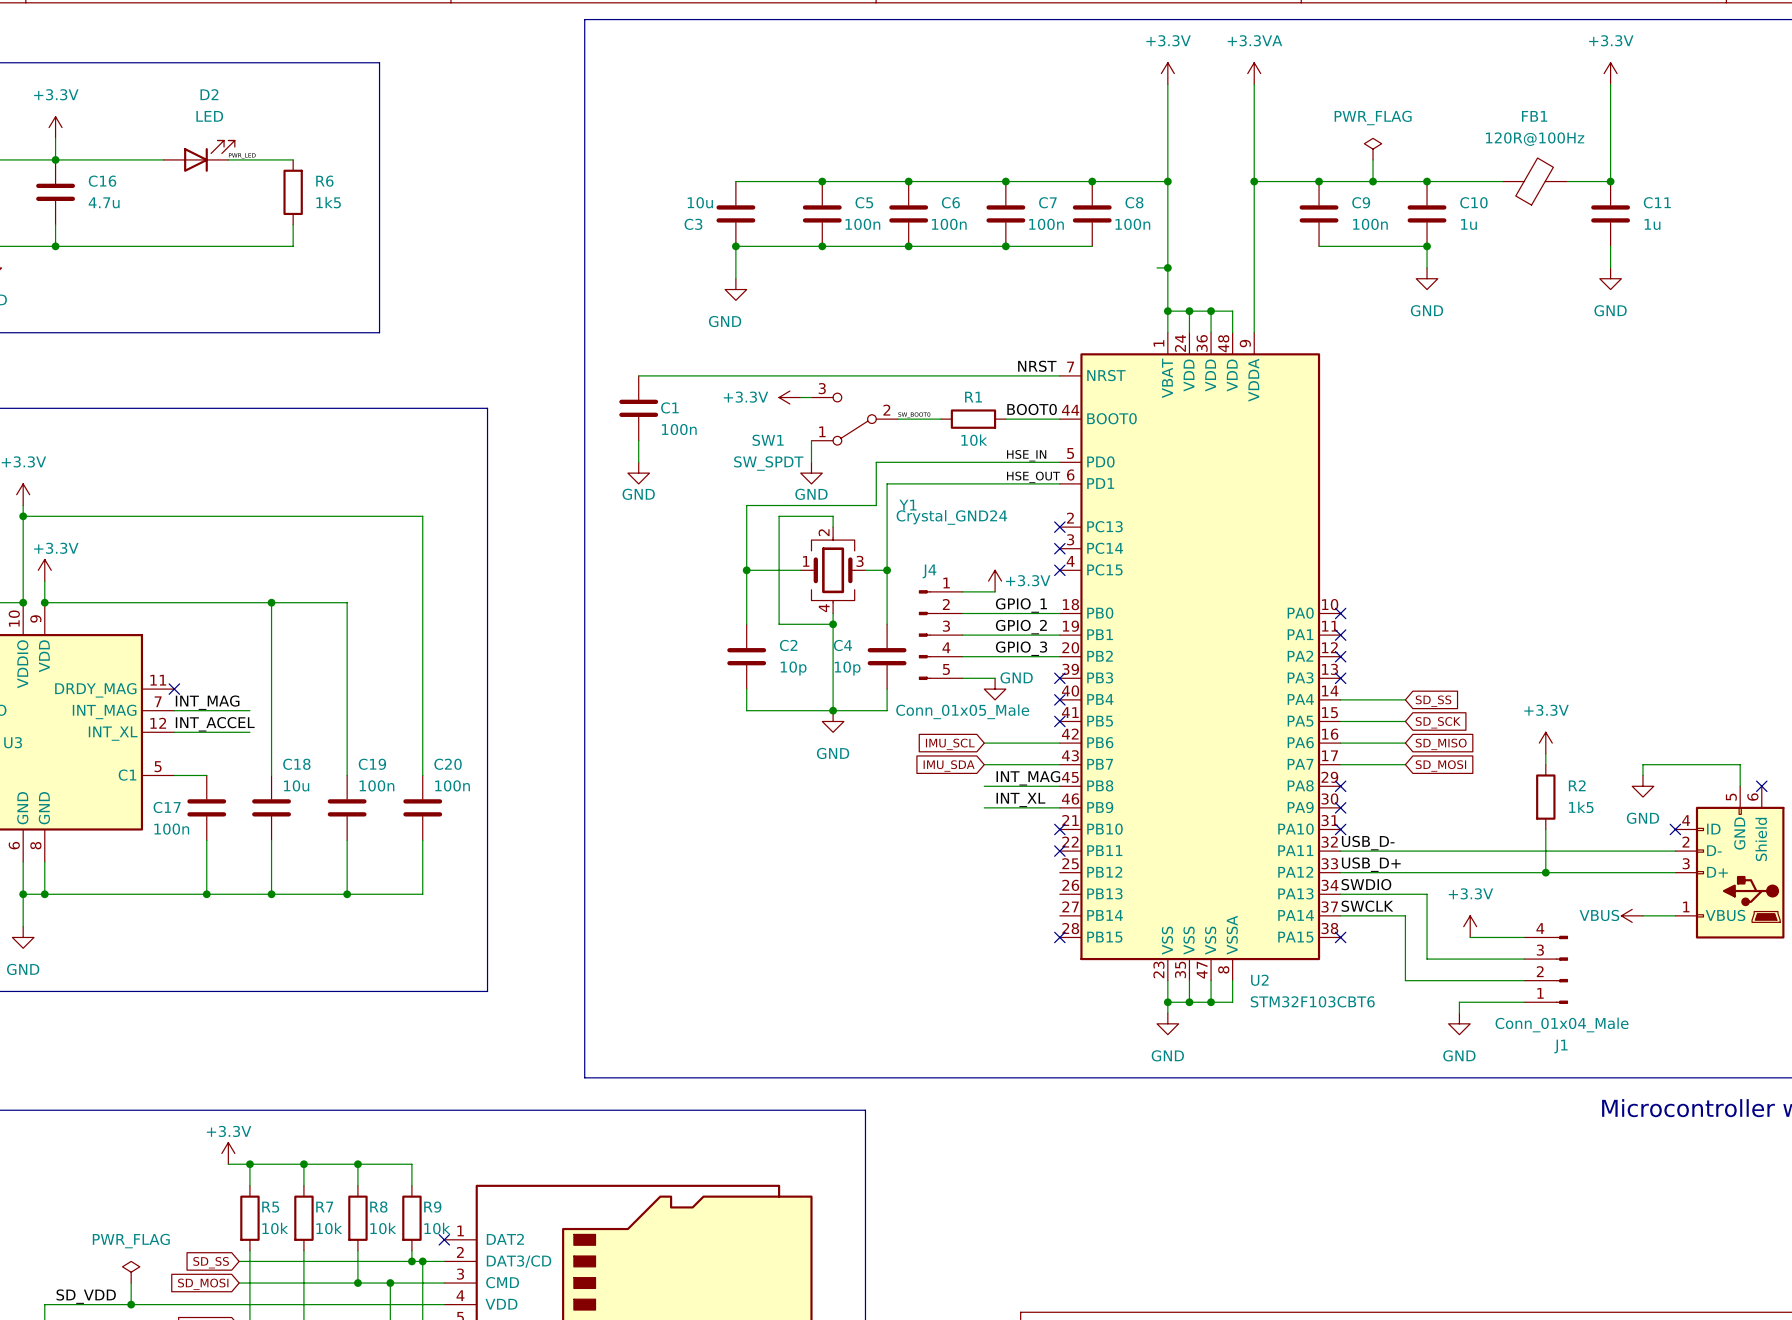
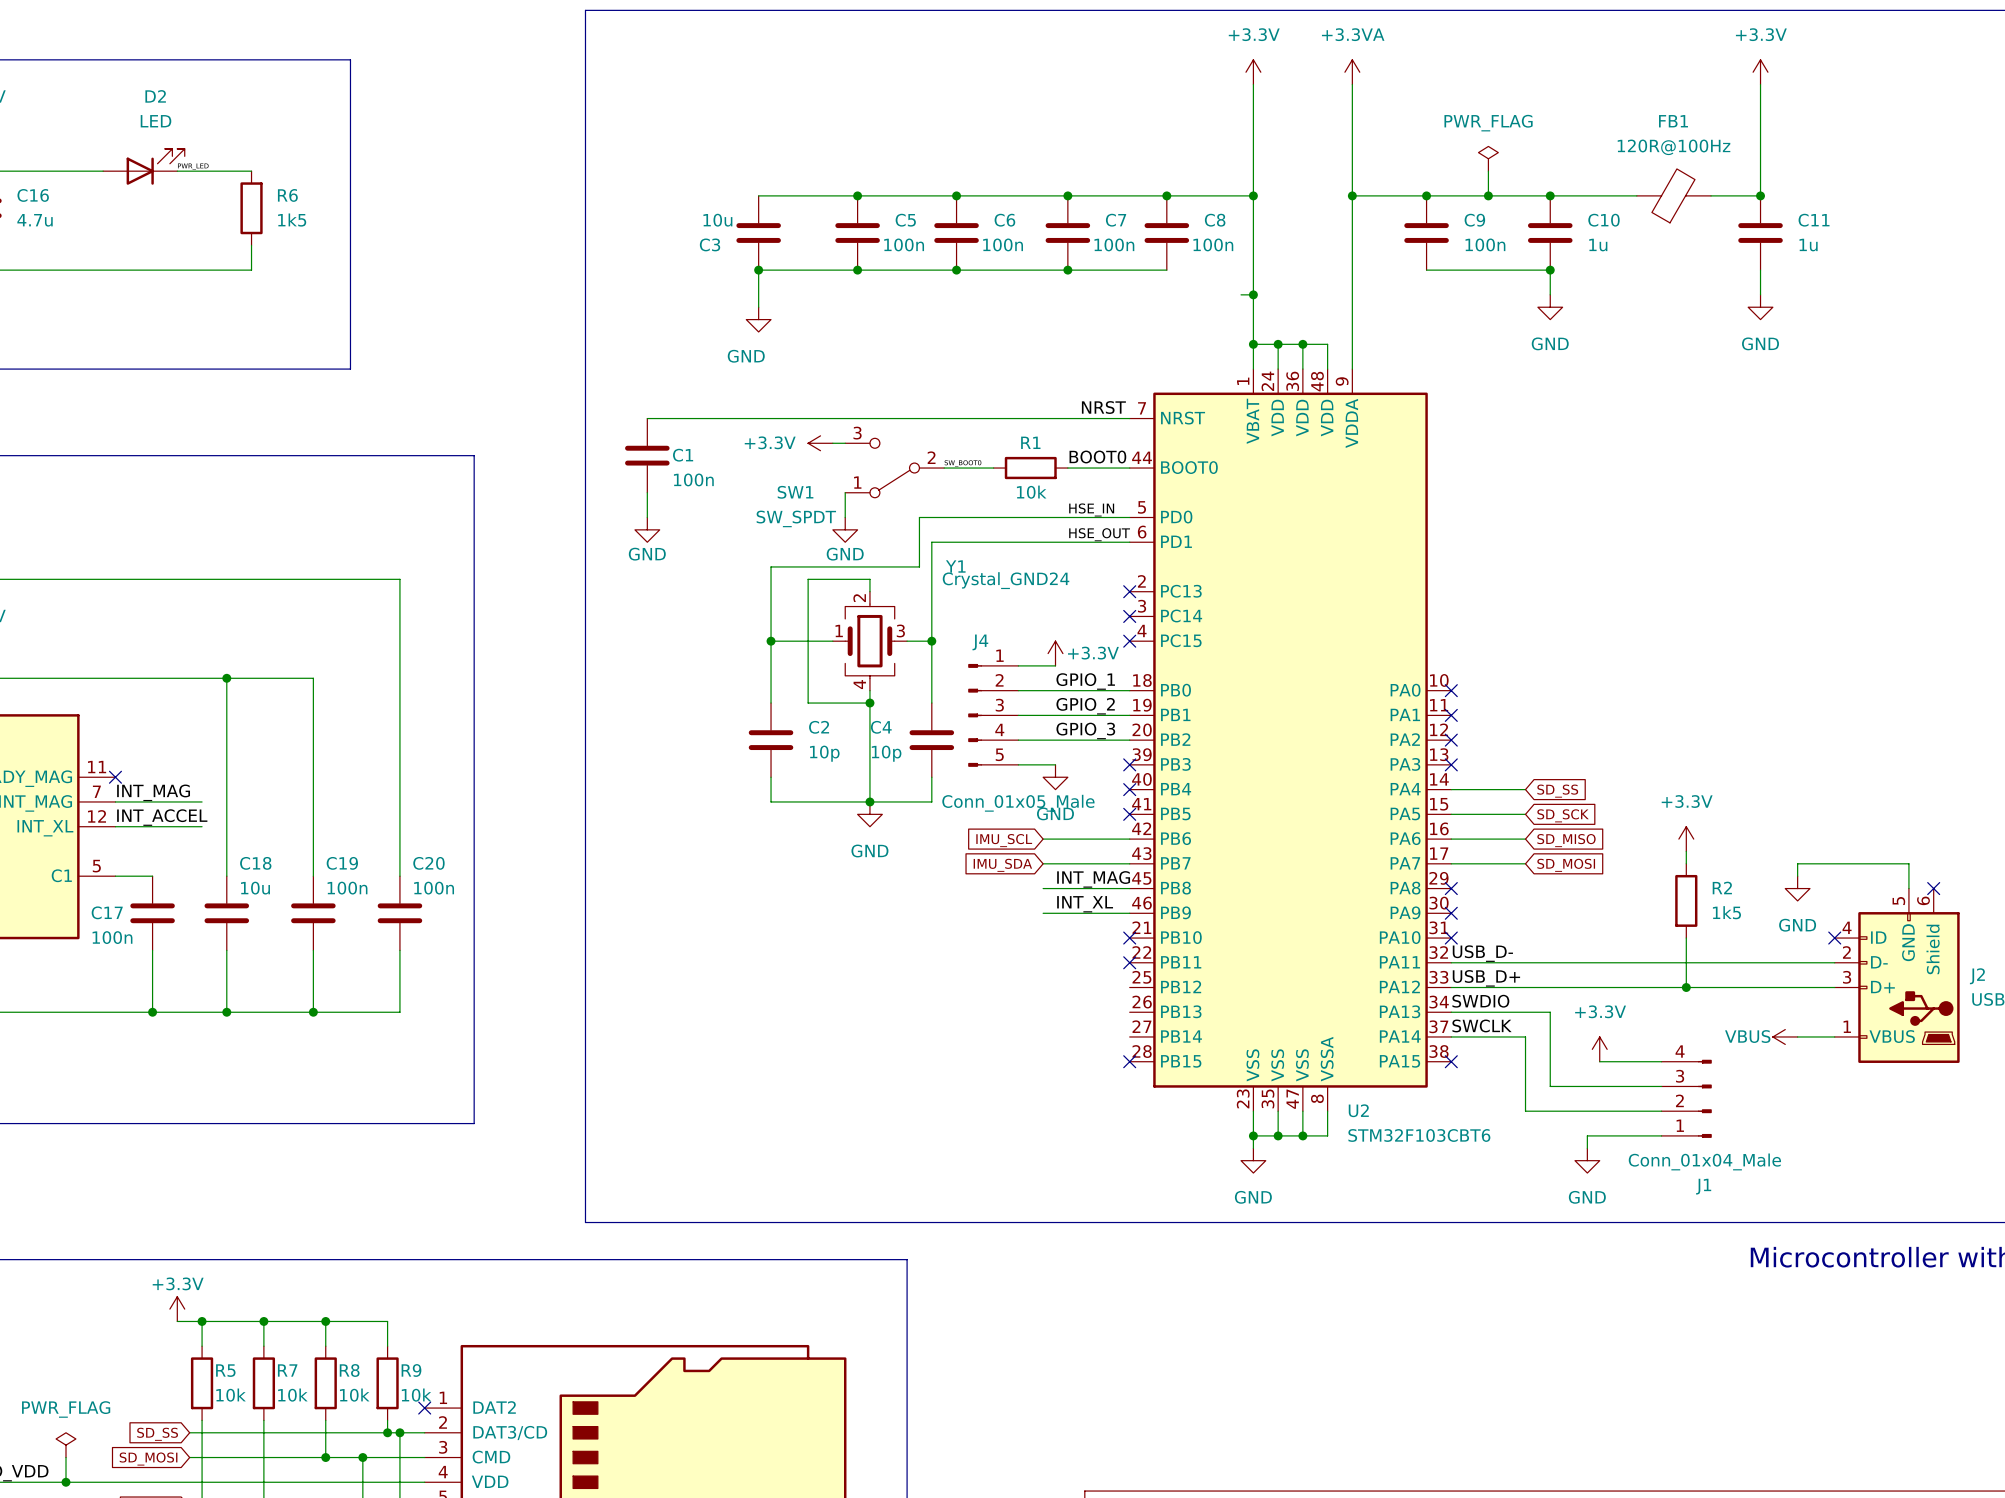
power symbol text position: GND (1016, 677) -> GND (1055, 813)

